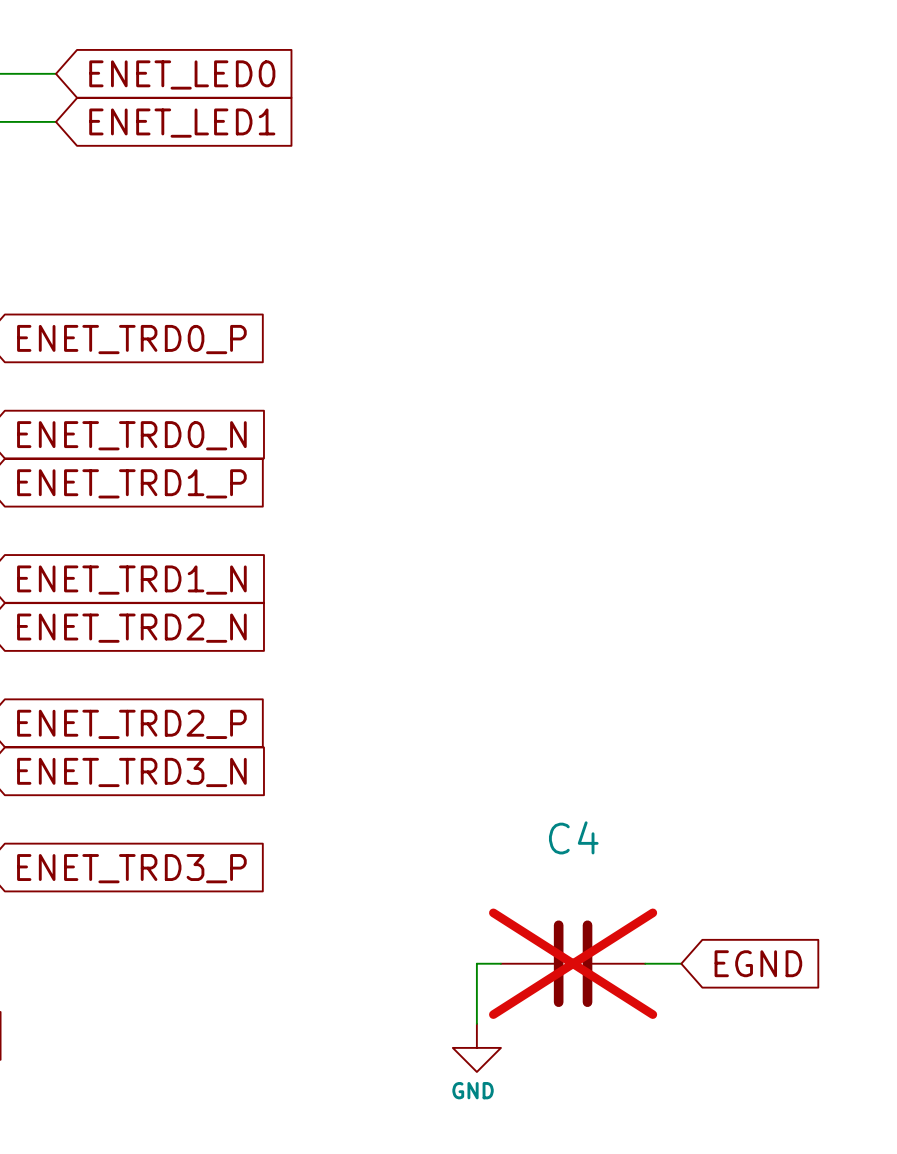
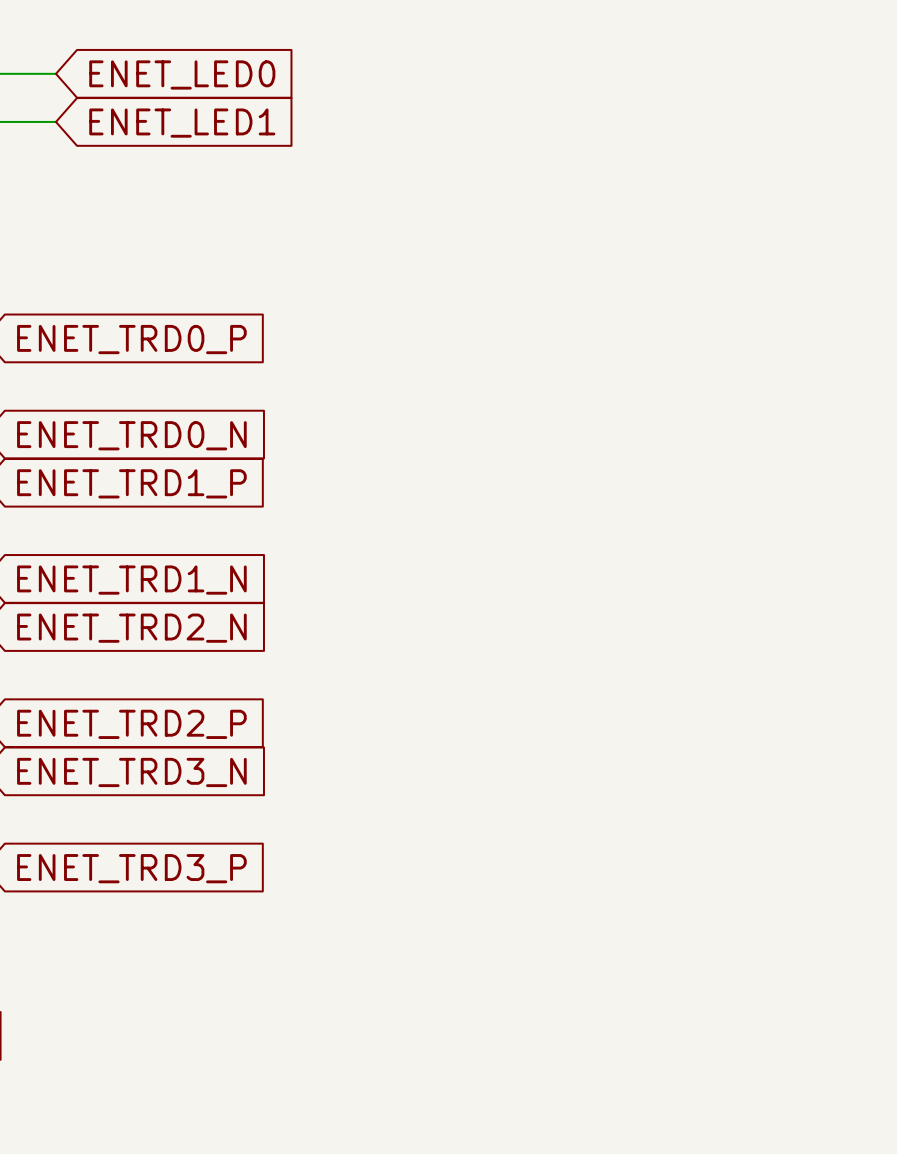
wire: (500, 963) (476, 963) (476, 1023) -> none
C4: (573, 963) -> none
wire: (645, 963) (681, 963) -> none
global label: EGND (758, 963) -> none
power symbol: GND (476, 1047) -> none

